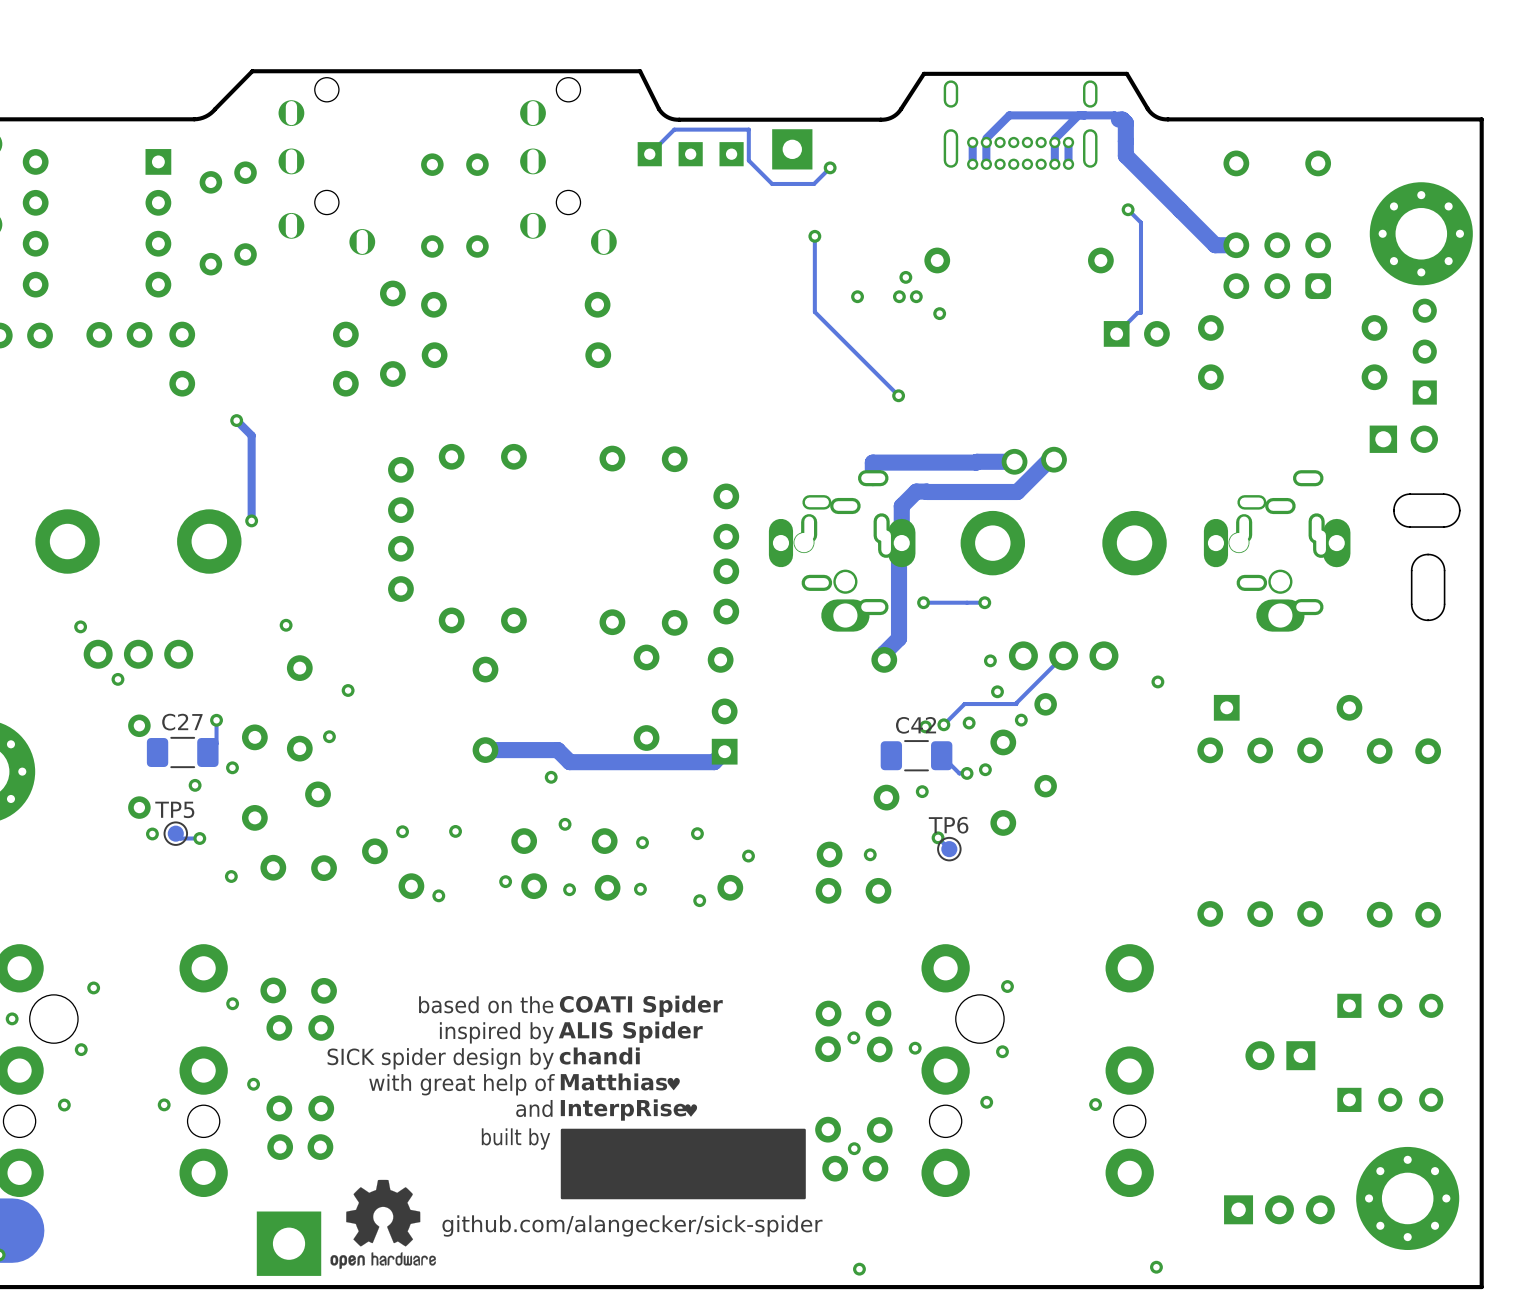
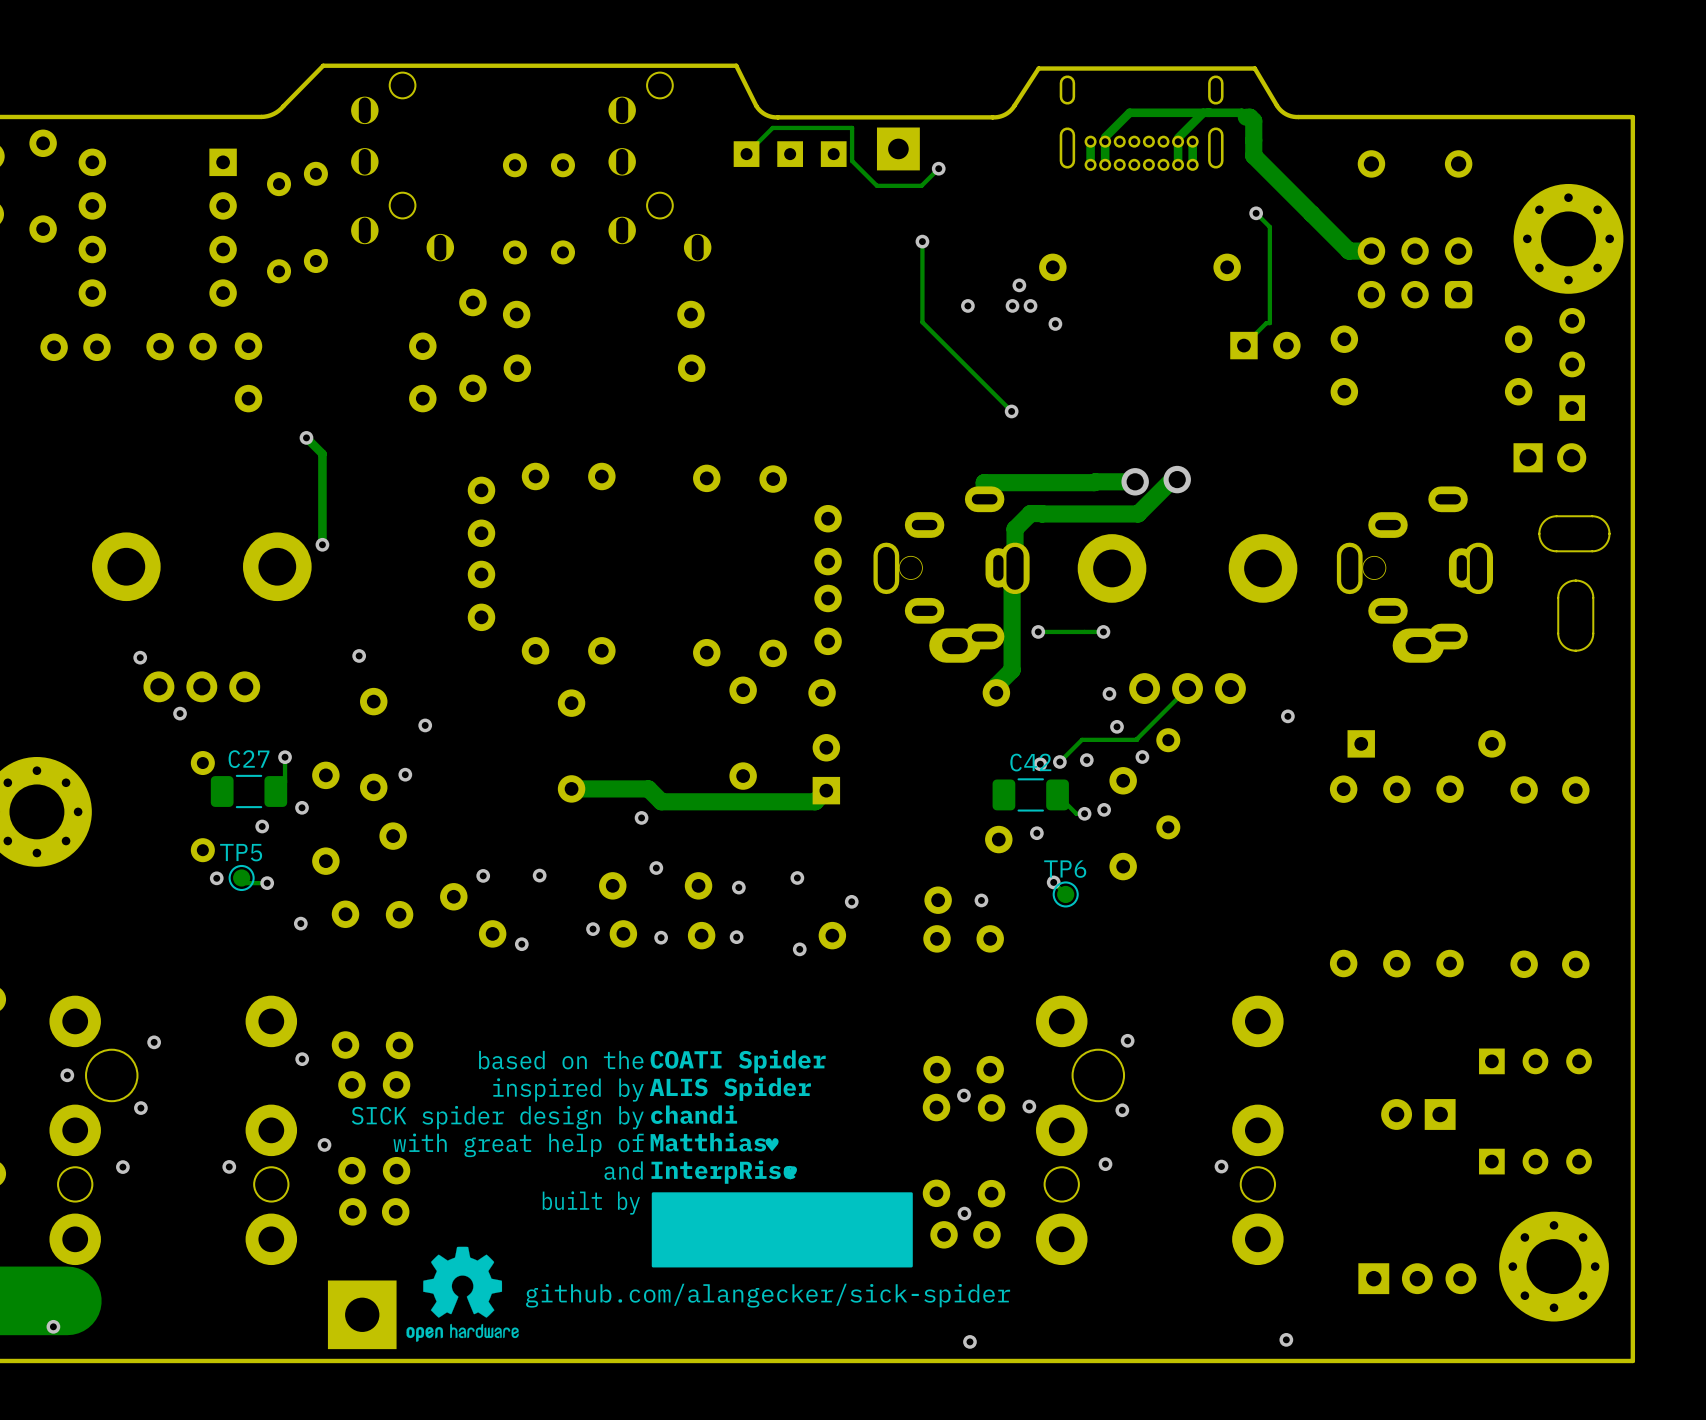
part footprint: [768, 470, 916, 632] -> [873, 486, 1030, 663]
part footprint: [1203, 470, 1351, 632] -> [1336, 486, 1494, 663]

